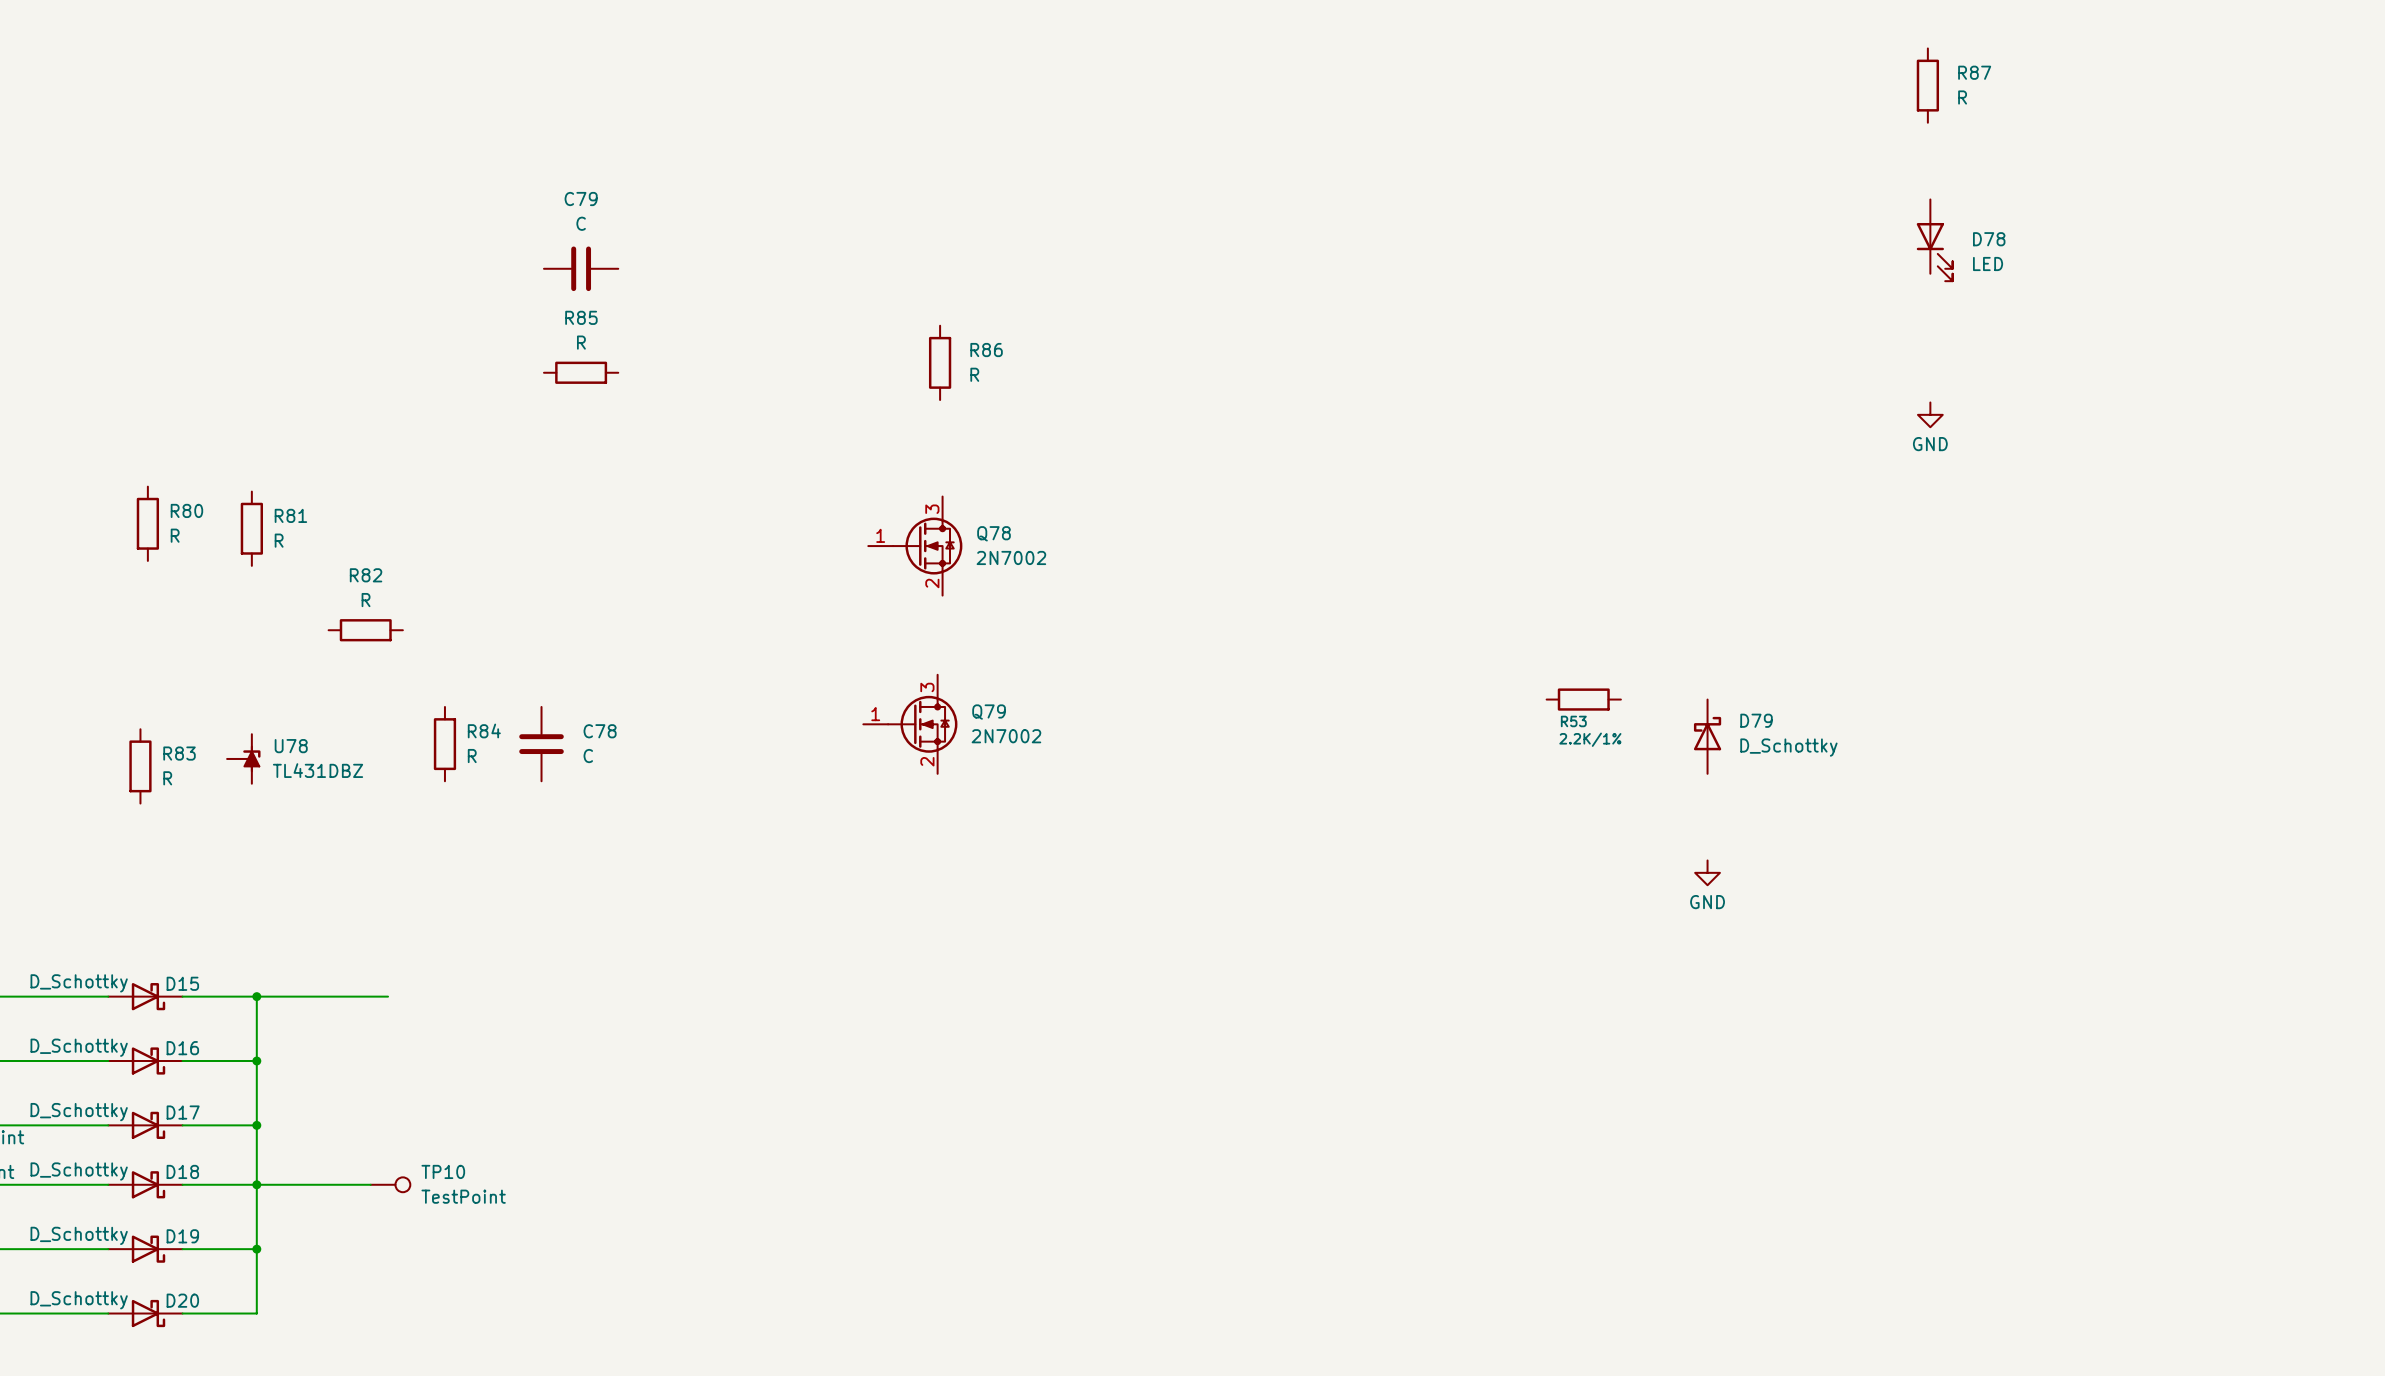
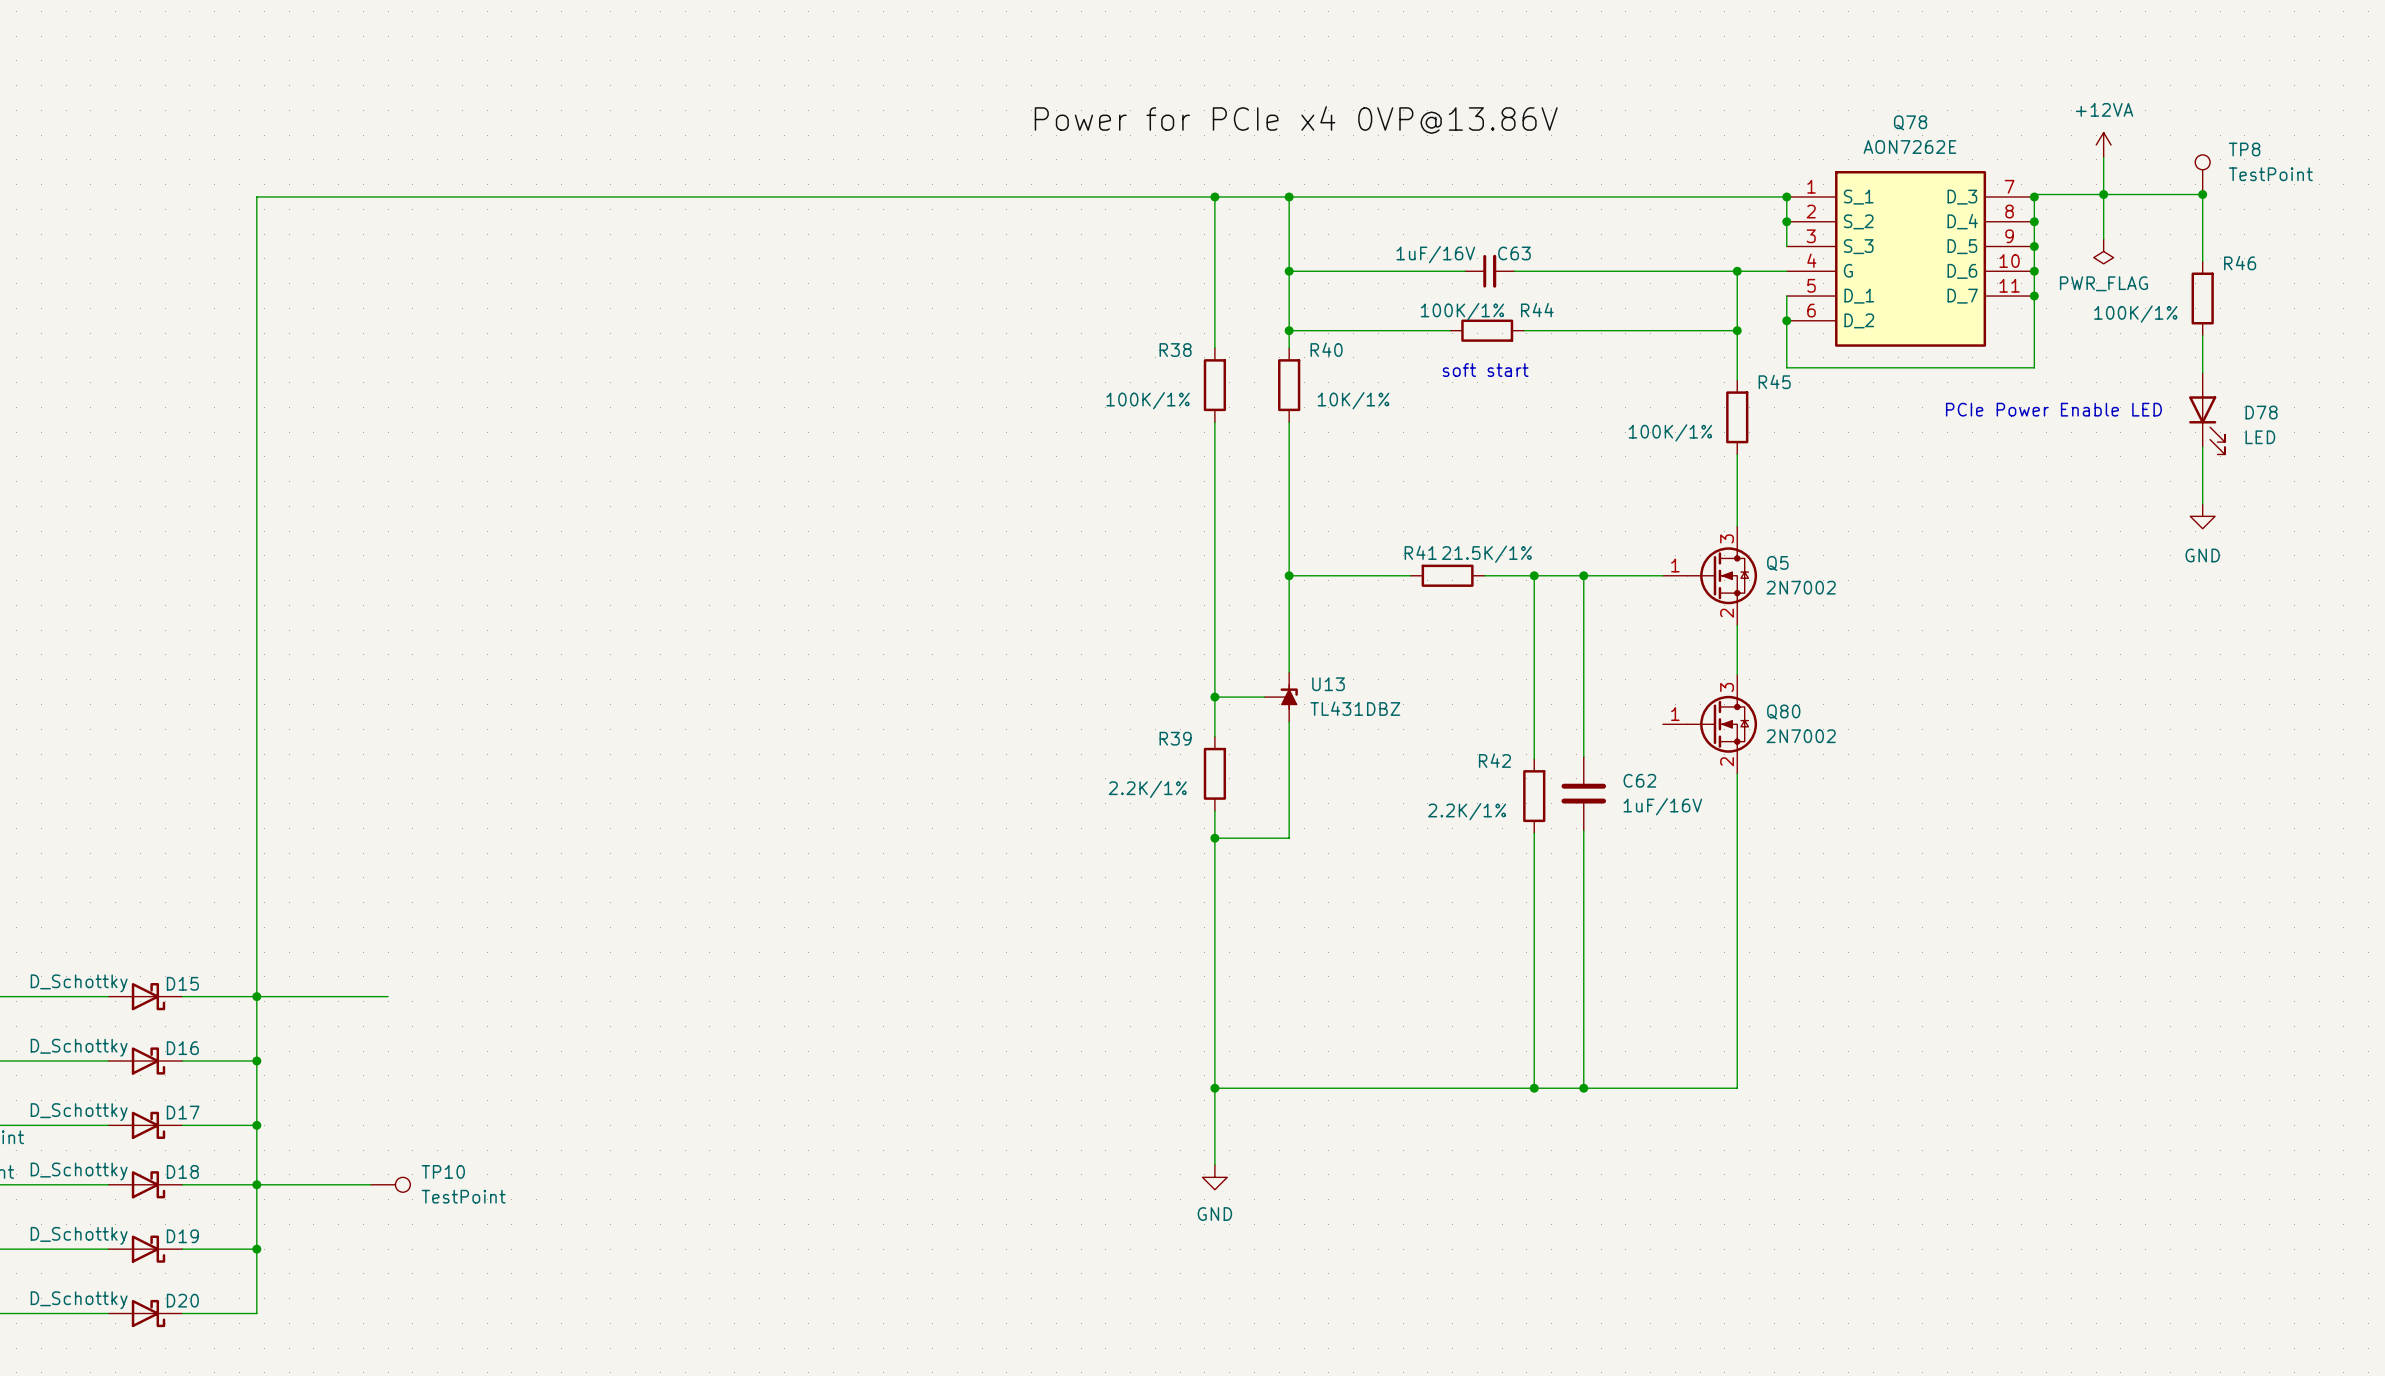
R87: R (1927, 85) -> none
label: none -> Power for PCIe x4 0VP@13.86V (1296, 120)
power symbol: none -> +12VA (2103, 145)
wire: none -> (2103, 157) (2103, 239)
TP8: none -> TestPoint (2202, 174)
junction: none -> (2103, 194)
junction: none -> (2202, 194)
wire: none -> (1214, 196) (1214, 348)
junction: none -> (1214, 196)
wire: none -> (1289, 196) (1289, 348)
junction: none -> (1289, 196)
junction: none -> (1786, 196)
junction: none -> (2034, 196)
junction: none -> (1786, 221)
junction: none -> (2034, 221)
D78 position: (1934, 240) -> (2207, 413)
wire: none -> (1786, 246) (1786, 196) (256, 196) (256, 996)
junction: none -> (2034, 246)
power symbol: none -> PWR_FLAG (2103, 251)
wire: none -> (2202, 261) (2202, 194) (2034, 194) (2034, 367) (1786, 367) (1786, 296)
C79: C (581, 268) -> none
wire: none -> (1289, 271) (1464, 271)
junction: none -> (1289, 271)
C63: none -> 1uF/16V (1489, 271)
wire: none -> (1514, 271) (1786, 271)
wire: none -> (1737, 271) (1737, 380)
junction: none -> (1737, 271)
junction: none -> (2034, 271)
junction: none -> (2034, 296)
R46: none -> 100K/1% (2202, 298)
junction: none -> (1786, 320)
wire: none -> (1289, 330) (1450, 330)
junction: none -> (1289, 330)
R44: none -> 100K/1% (1487, 330)
wire: none -> (1524, 330) (1737, 330)
junction: none -> (1737, 330)
wire: none -> (2202, 335) (2202, 372)
R86: R (940, 362) -> none
text: none -> soft start (1485, 370)
R85: R (581, 372) -> none
R38: none -> 100K/1% (1214, 385)
R40: none -> 10K/1% (1289, 385)
text: none -> PCIe Power Enable LED (2053, 409)
power symbol: GND (1930, 414) -> none
R45: none -> 100K/1% (1737, 417)
wire: none -> (1214, 422) (1214, 736)
wire: none -> (1289, 422) (1289, 672)
wire: none -> (2202, 447) (2202, 503)
wire: none -> (1737, 454) (1737, 526)
Q78 symbol: [868, 496, 963, 596] -> [1786, 171, 2035, 347]
power symbol: none -> GND (2202, 516)
R80: R (147, 523) -> none
R81: R (251, 528) -> none
Q78 name position: Q78 (994, 533) -> Q78 (1910, 122)
Q78 value: 2N7002 (1011, 557) -> AON7262E (1909, 147)
wire: none -> (1289, 575) (1410, 575)
junction: none -> (1289, 575)
R41: none -> 21.5K/1% (1447, 575)
wire: none -> (1484, 575) (1662, 575)
wire: none -> (1534, 575) (1534, 758)
junction: none -> (1534, 575)
wire: none -> (1583, 575) (1583, 756)
junction: none -> (1583, 575)
Q5: none -> 2N7002 (1710, 575)
wire: none -> (1737, 625) (1737, 674)
R82: R (365, 630) -> none
wire: none -> (1214, 697) (1264, 697)
junction: none -> (1214, 697)
U13: none -> TL431DBZ (1281, 697)
R53: 2.2K/1% (1583, 699) -> none
wire: none -> (1289, 721) (1289, 838) (1214, 838)
Q79: 2N7002 (910, 724) -> none
Q80: none -> 2N7002 (1710, 724)
D79: D_Schottky (1707, 736) -> none
R84: R (444, 744) -> none
C78: C (541, 744) -> none
U78: TL431DBZ (243, 758) -> none
R83: R (140, 766) -> none
R39: none -> 2.2K/1% (1214, 773)
wire: none -> (1737, 773) (1737, 1088) (1214, 1088)
C62: none -> 1uF/16V (1583, 793)
R42: none -> 2.2K/1% (1534, 796)
wire: none -> (1214, 810) (1214, 1164)
wire: none -> (1583, 830) (1583, 1088)
wire: none -> (1534, 833) (1534, 1088)
junction: none -> (1214, 838)
power symbol: GND (1707, 872) -> none
junction: none -> (1214, 1088)
junction: none -> (1534, 1088)
junction: none -> (1583, 1088)
power symbol: none -> GND (1214, 1177)

